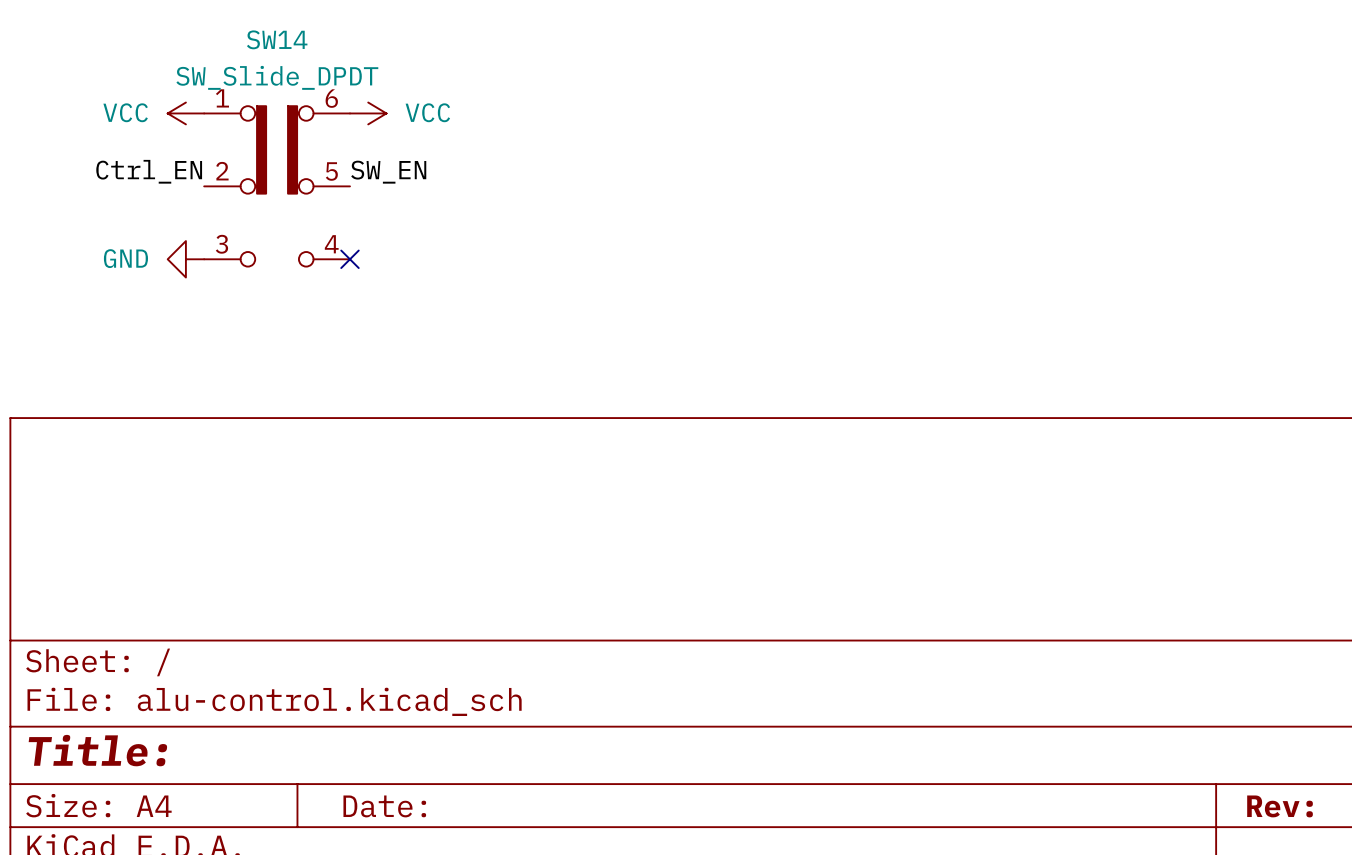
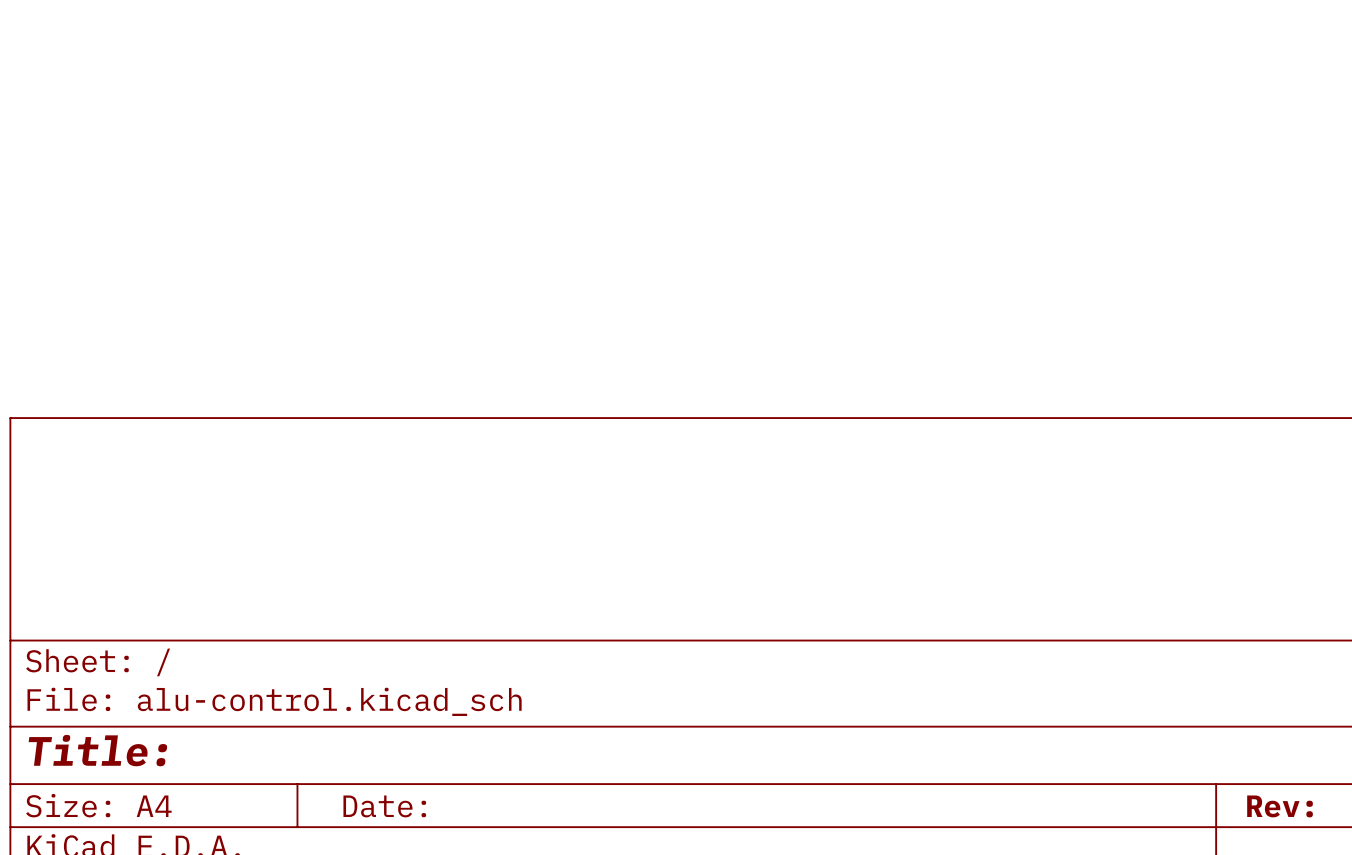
power symbol: VCC (185, 113) -> none
power symbol: VCC (368, 113) -> none
label: Ctrl_EN (149, 171) -> none
label: SW_EN (388, 172) -> none
SW14: SW_Slide_DPDT (277, 186) -> none
power symbol: GND (185, 259) -> none
no-connect mark: (349, 259) -> none

